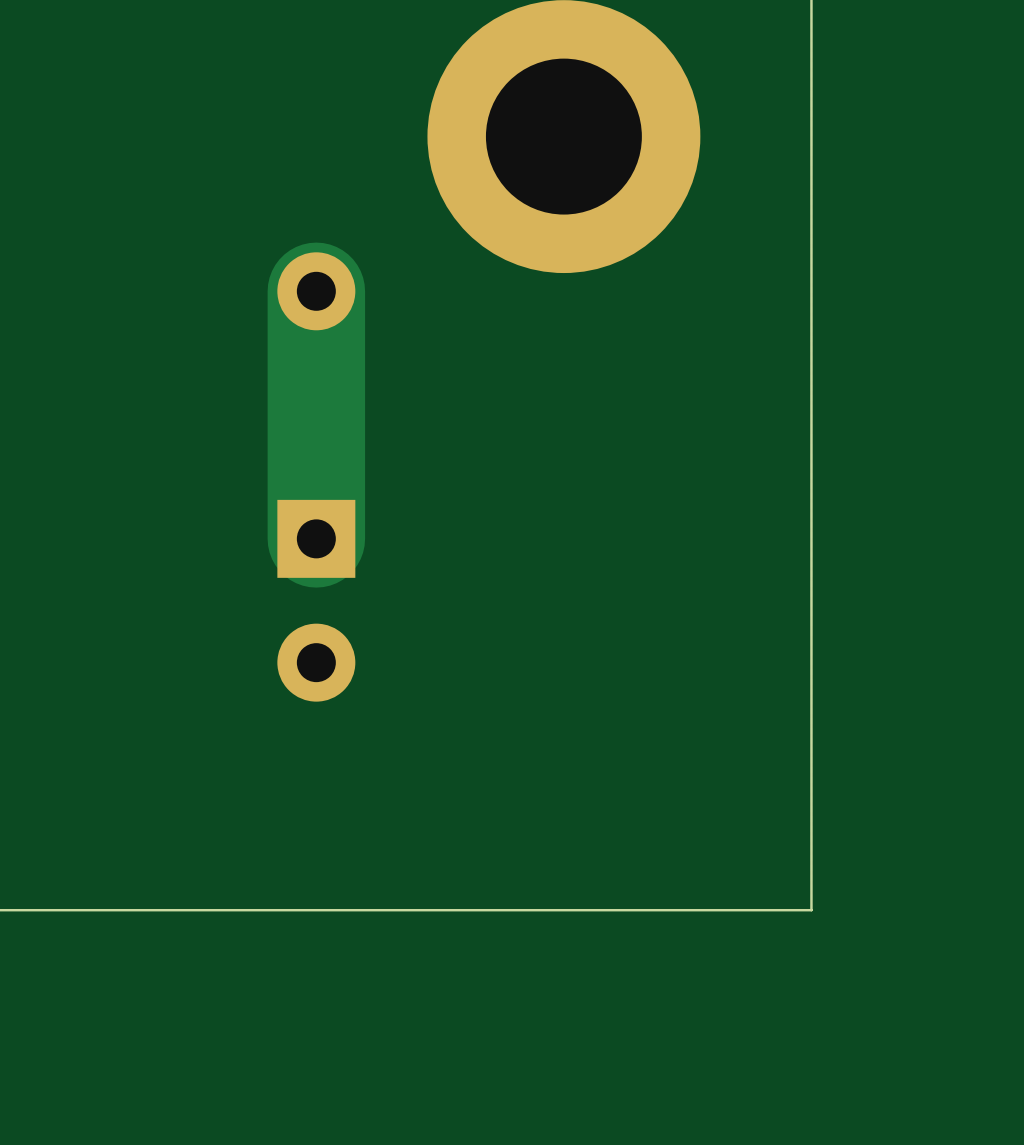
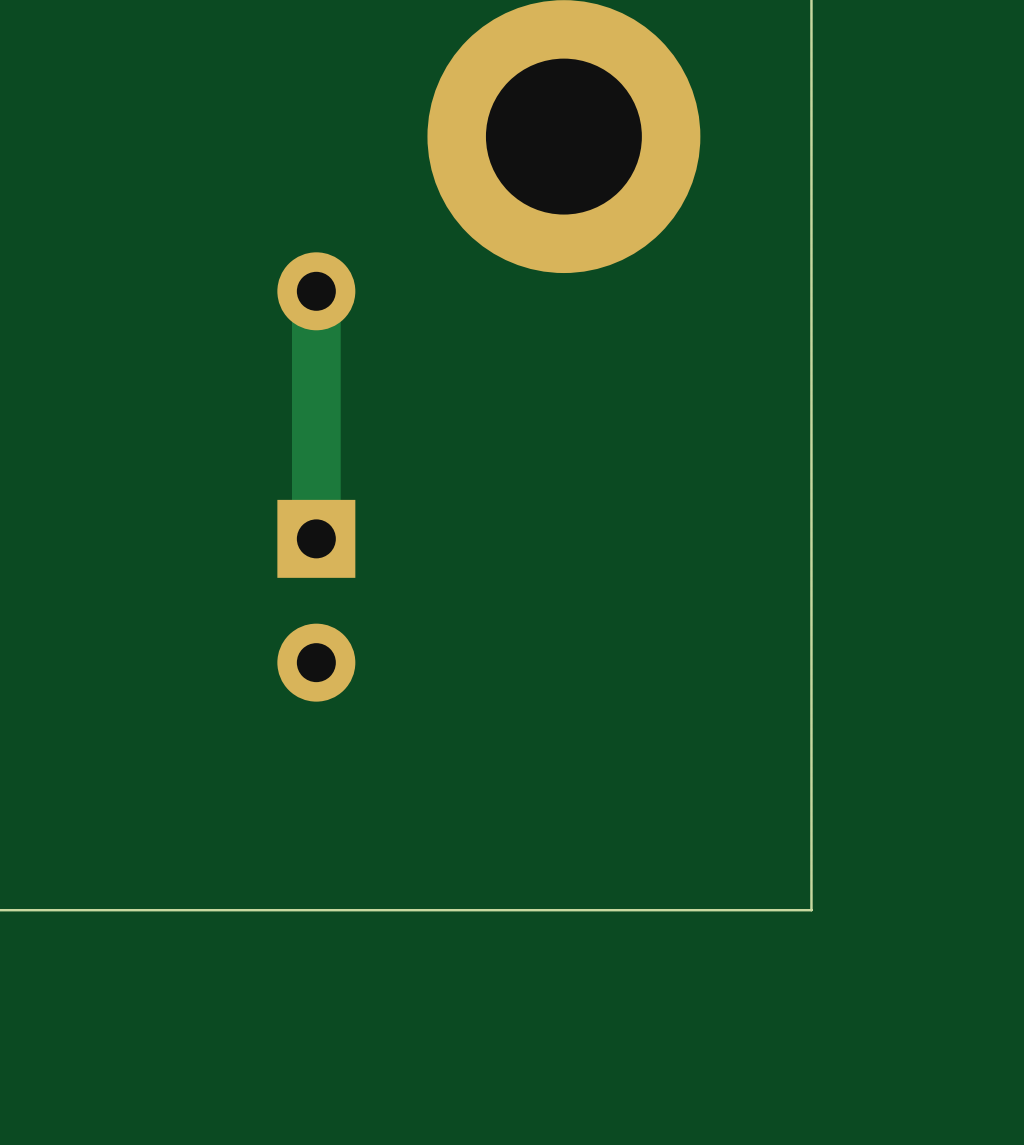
track width: thick (316, 291) (316, 538) -> thin (316, 291) (316, 538)

